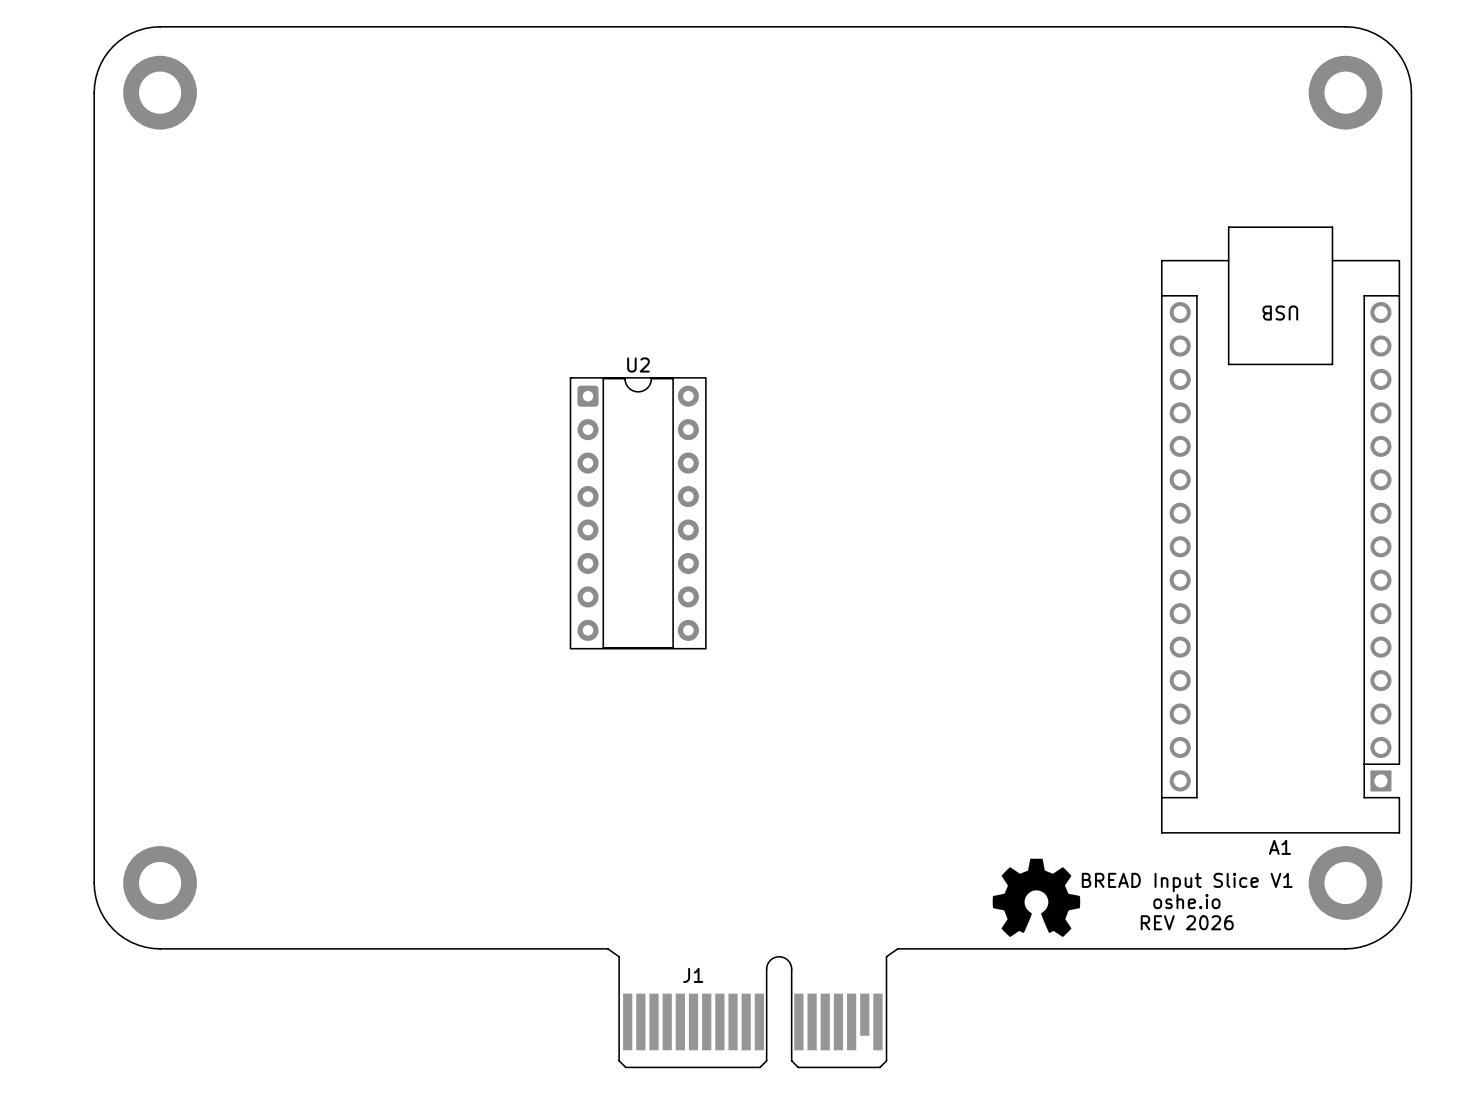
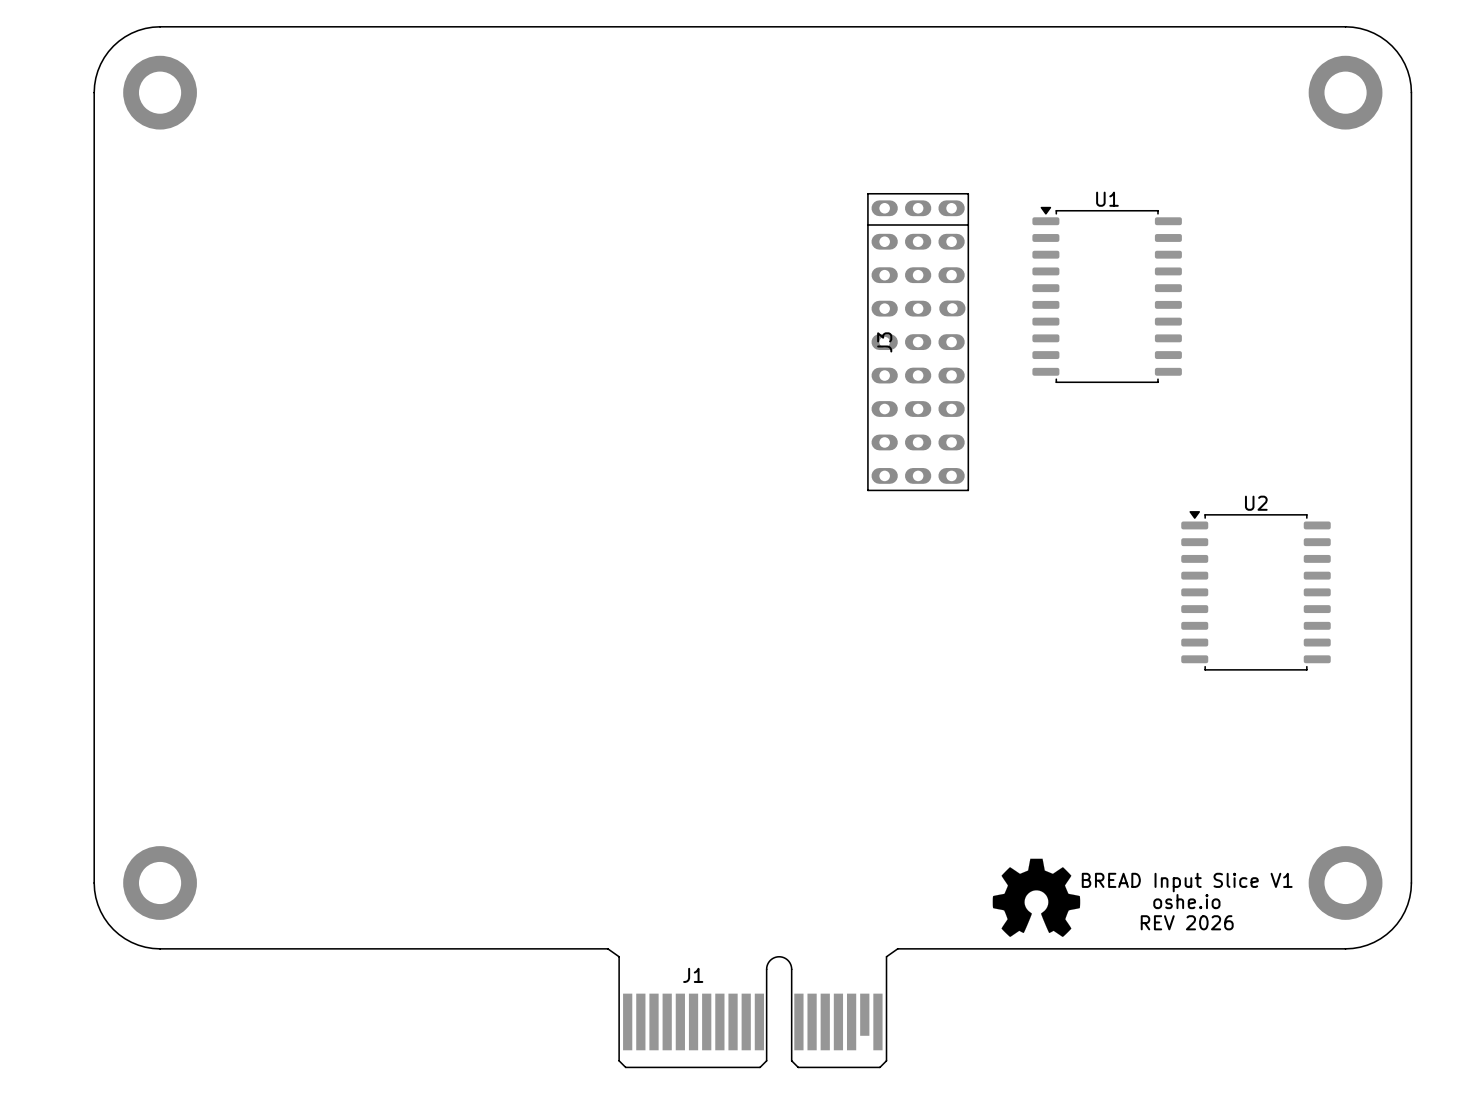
U1: none -> (1107, 294)
J3: none -> (918, 342)
U2 name position: U2 (638, 365) -> U2 (1256, 503)
U2 footprint: [569, 377, 707, 650] -> [1181, 511, 1331, 671]
A1: (1280, 530) -> none

